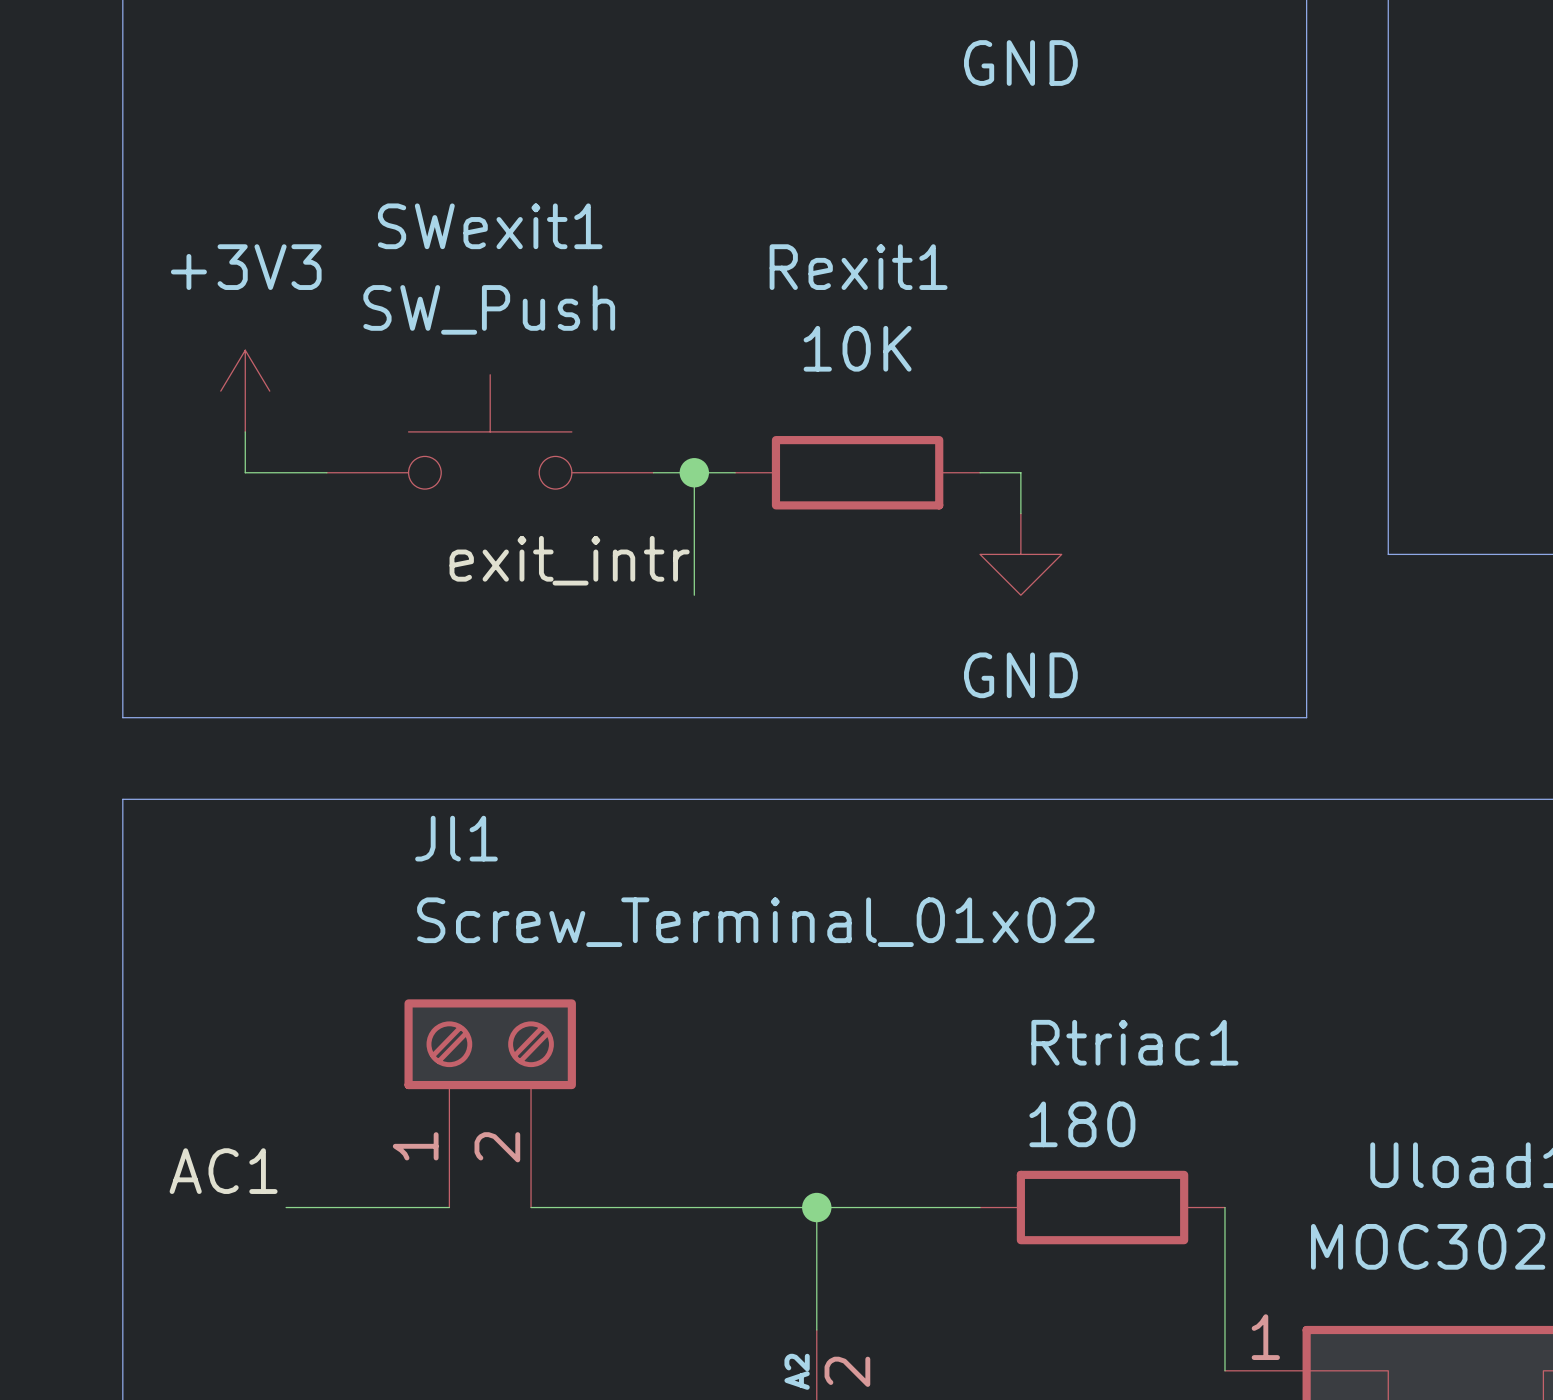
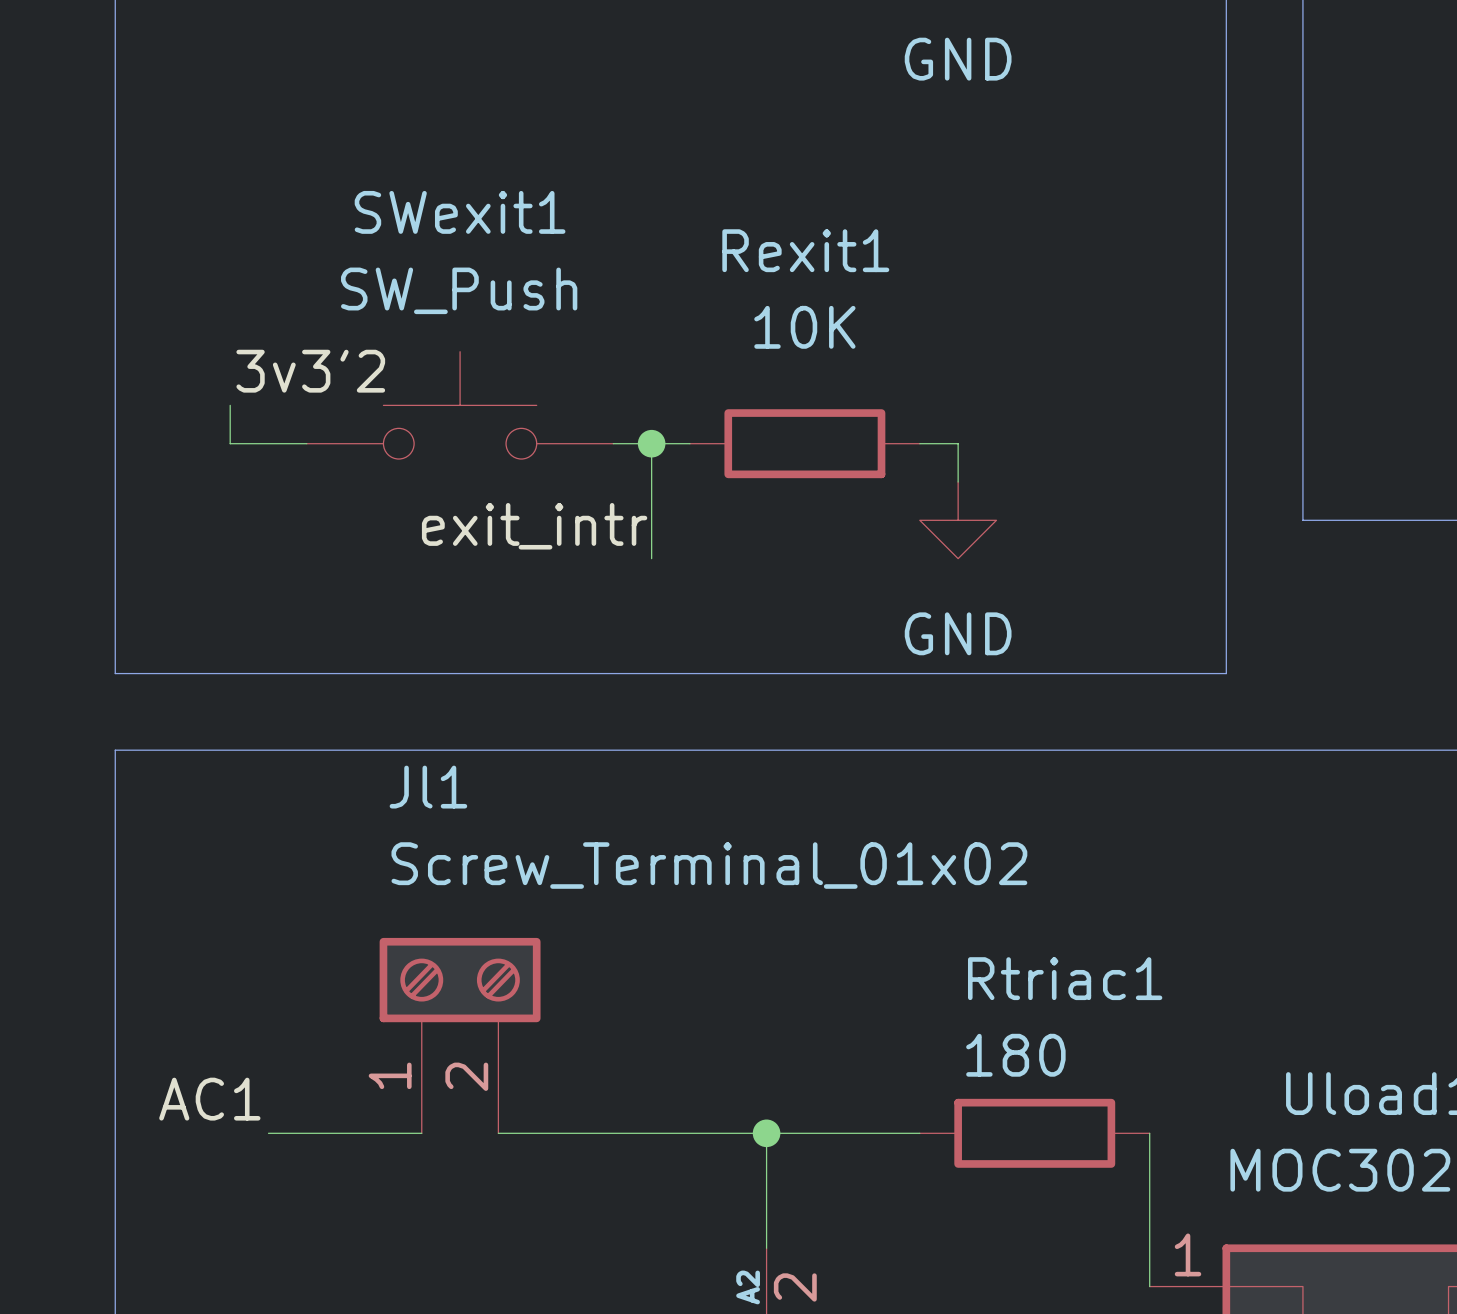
power symbol: +3V3 (245, 391) -> none
label: none -> 3v3'2 (310, 371)

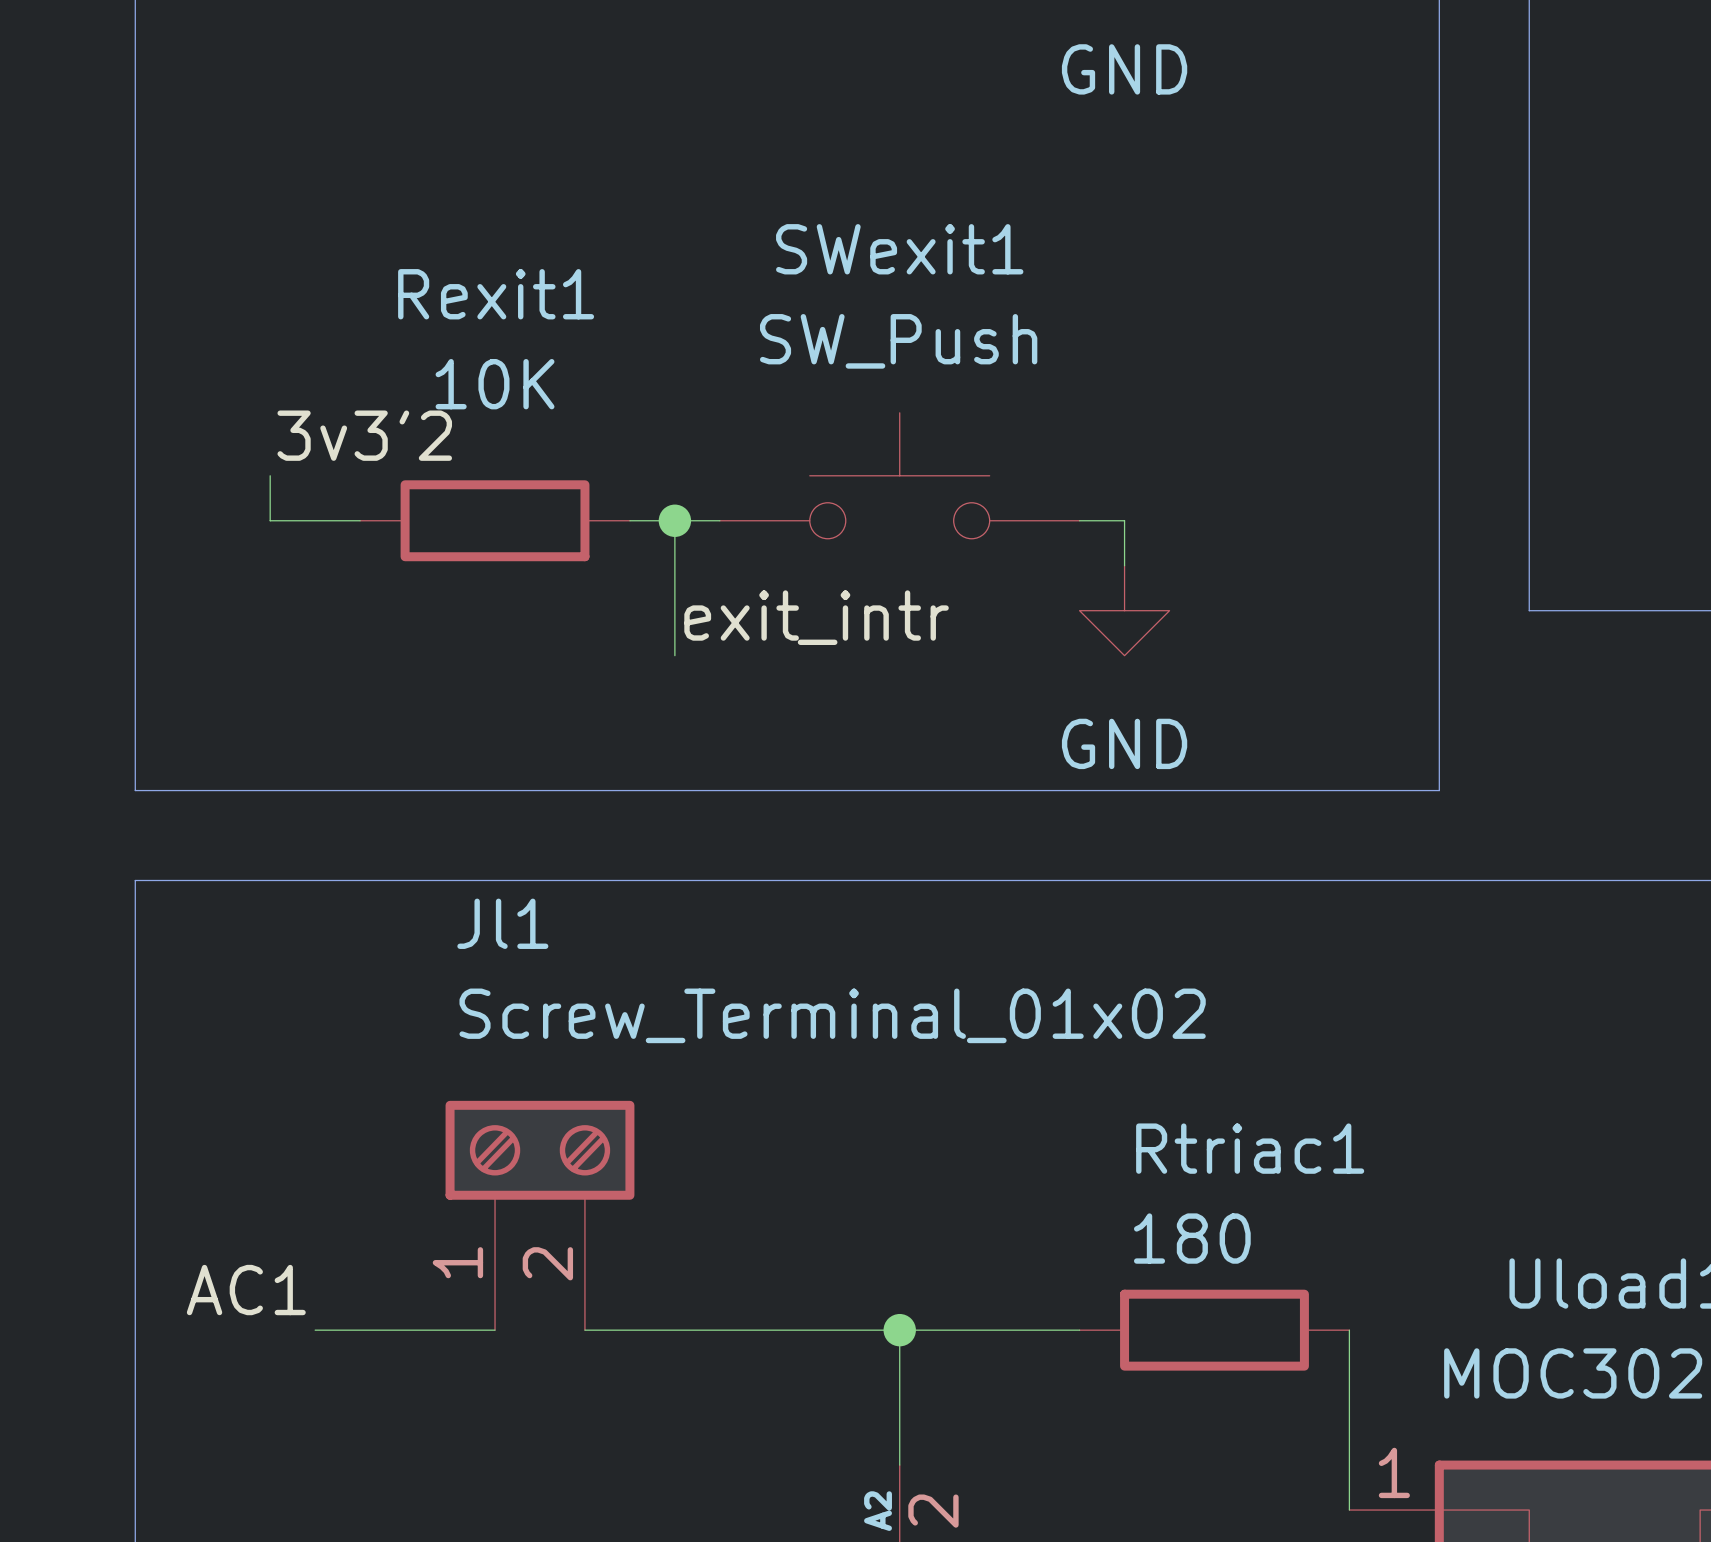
SWexit1 position: (460, 405) -> (899, 475)
wire: (651, 443) (651, 558) -> (674, 520) (674, 655)
junction position: (651, 443) -> (674, 520)
Rexit1 position: (804, 443) -> (495, 520)
label position: exit_intr (534, 526) -> exit_intr (816, 617)

